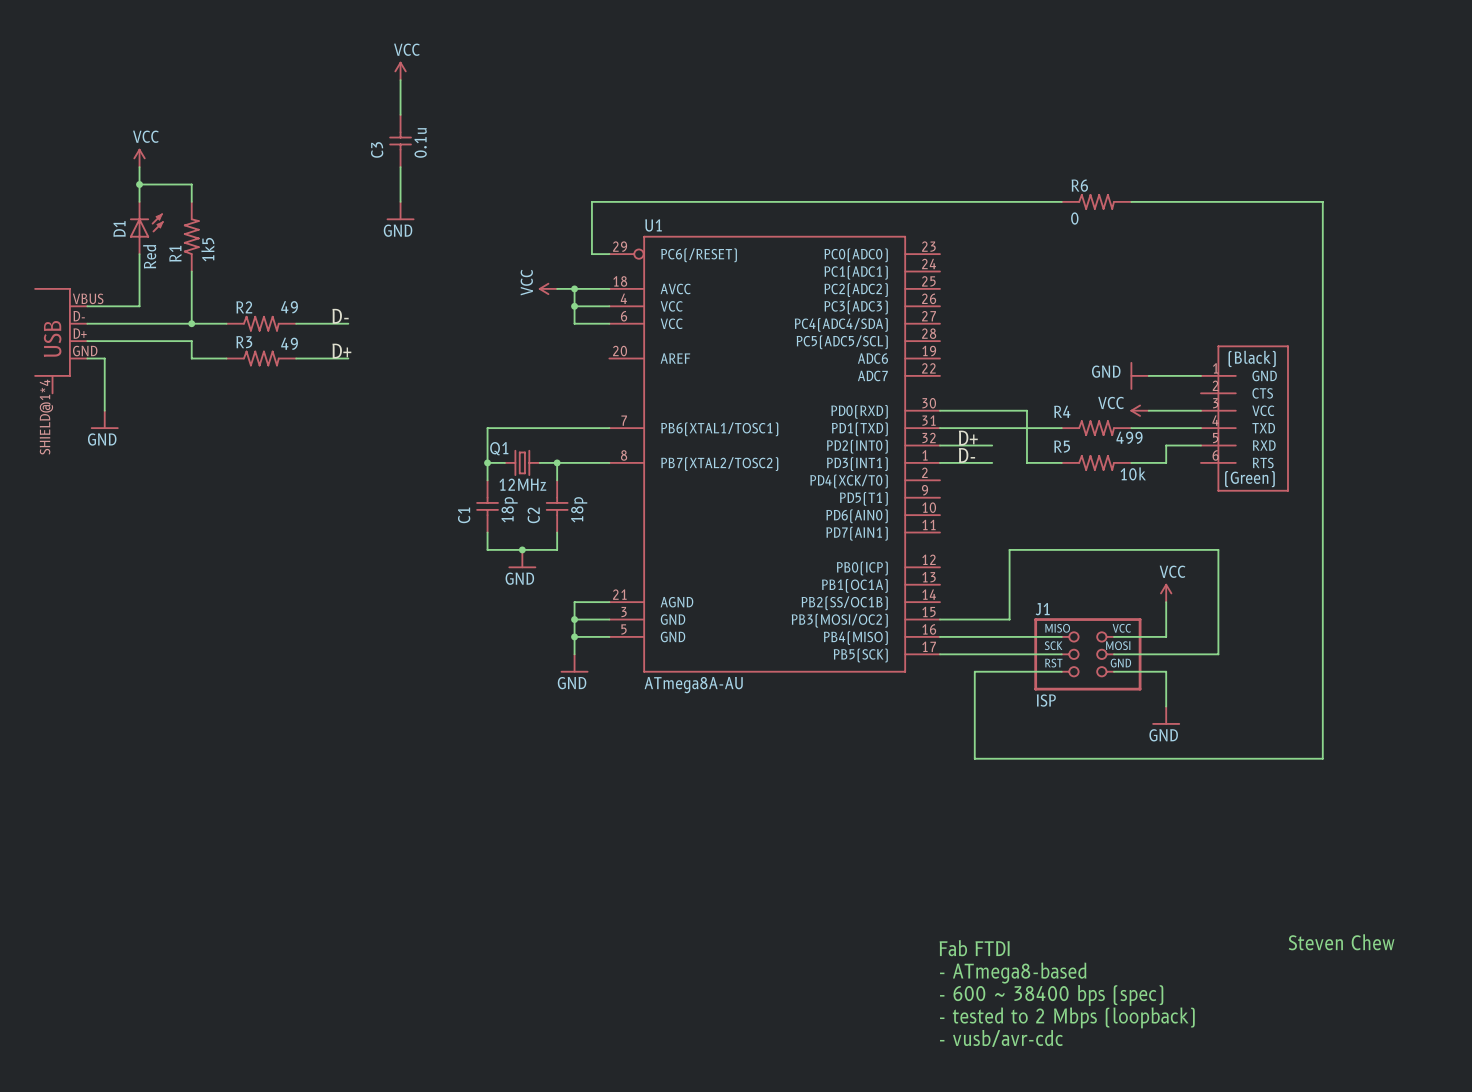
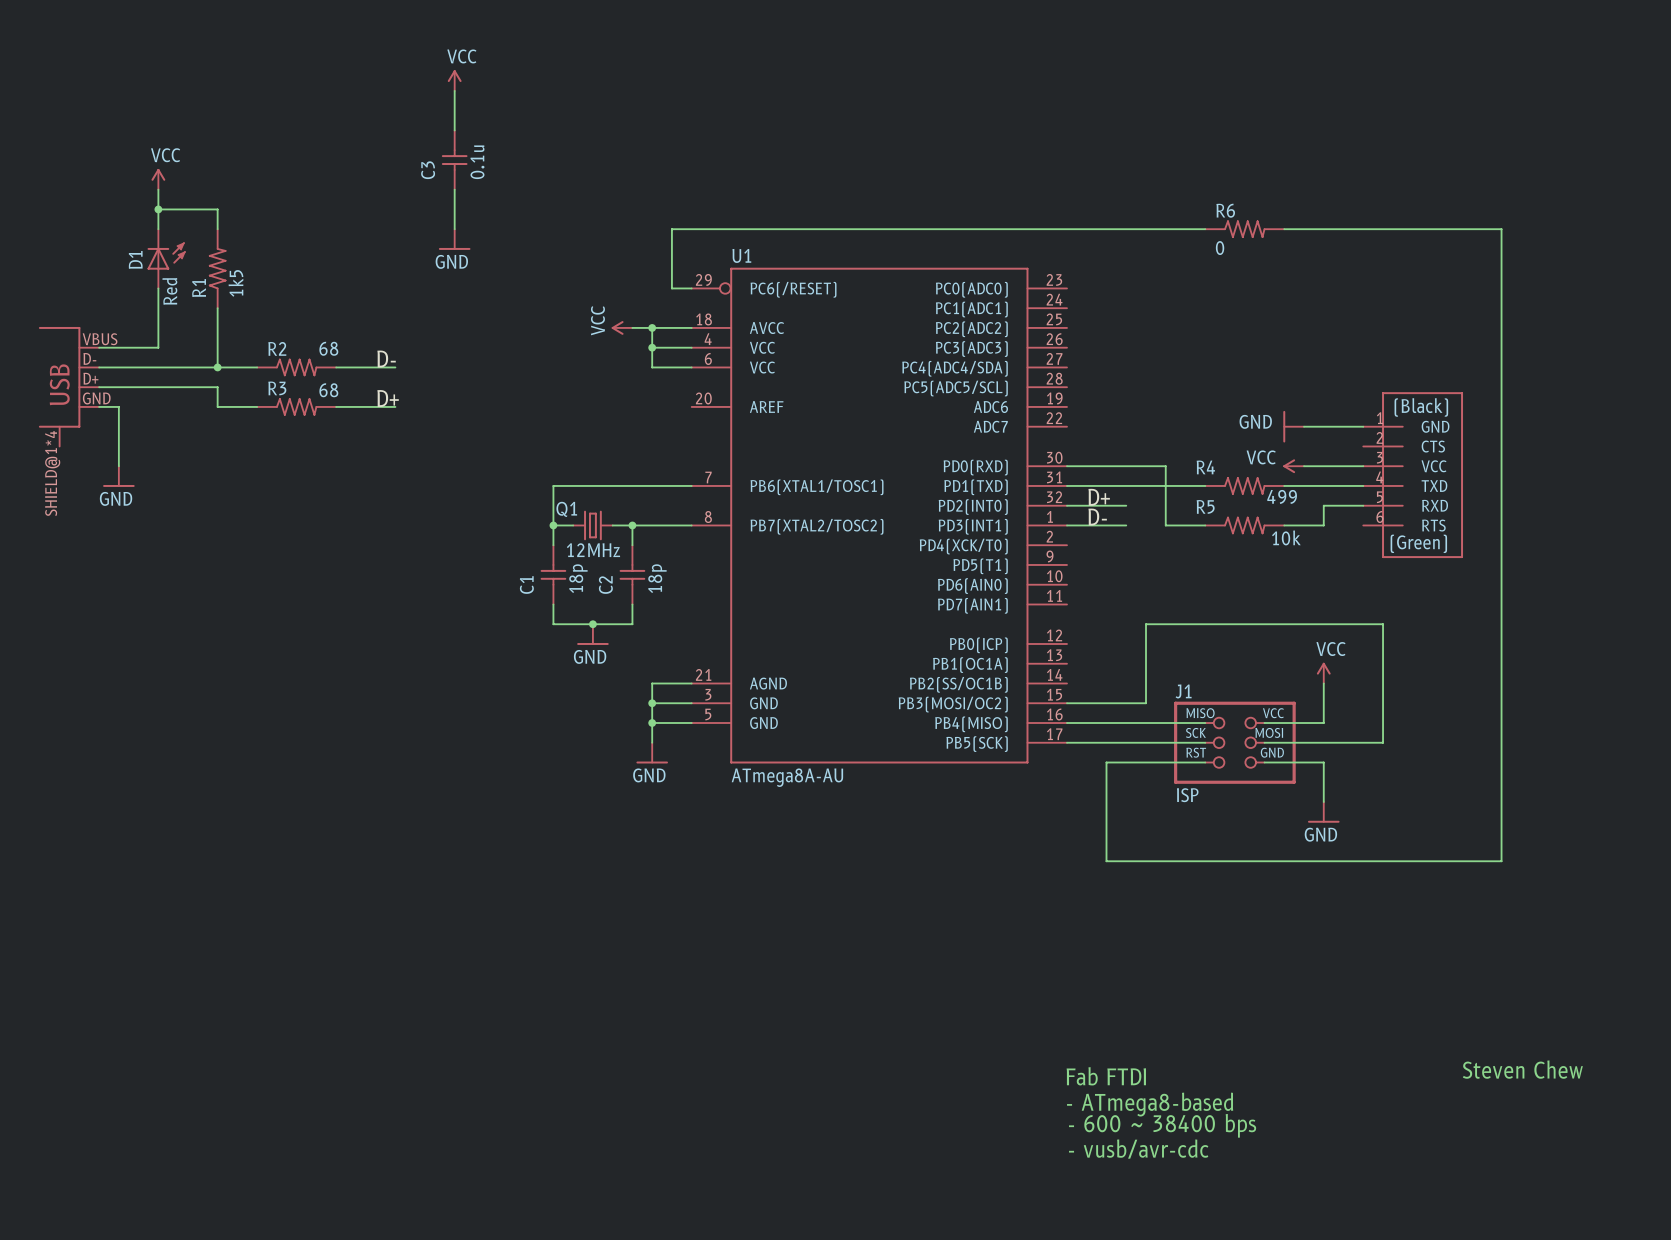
R2 value: 49 (289, 307) -> 68 (328, 348)
R3 value: 49 (289, 343) -> 68 (328, 390)
text: - 600 ~ 38400 bps (spec) (1051, 995) -> - 600 ~ 38400 bps (1162, 1125)
text: - tested to 2 Mbps (loopback) (1067, 1017) -> - vusb/avr-cdc (1138, 1149)
text: - vusb/avr-cdc (1001, 1038) -> none

